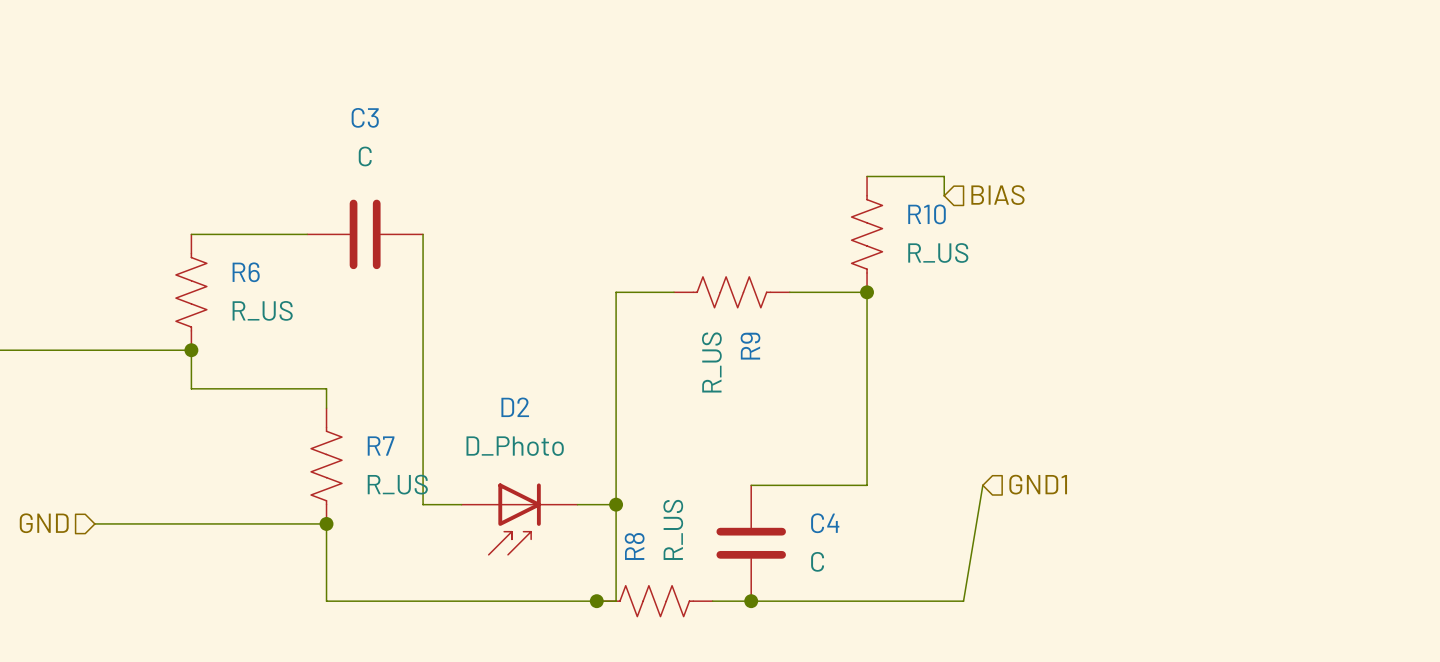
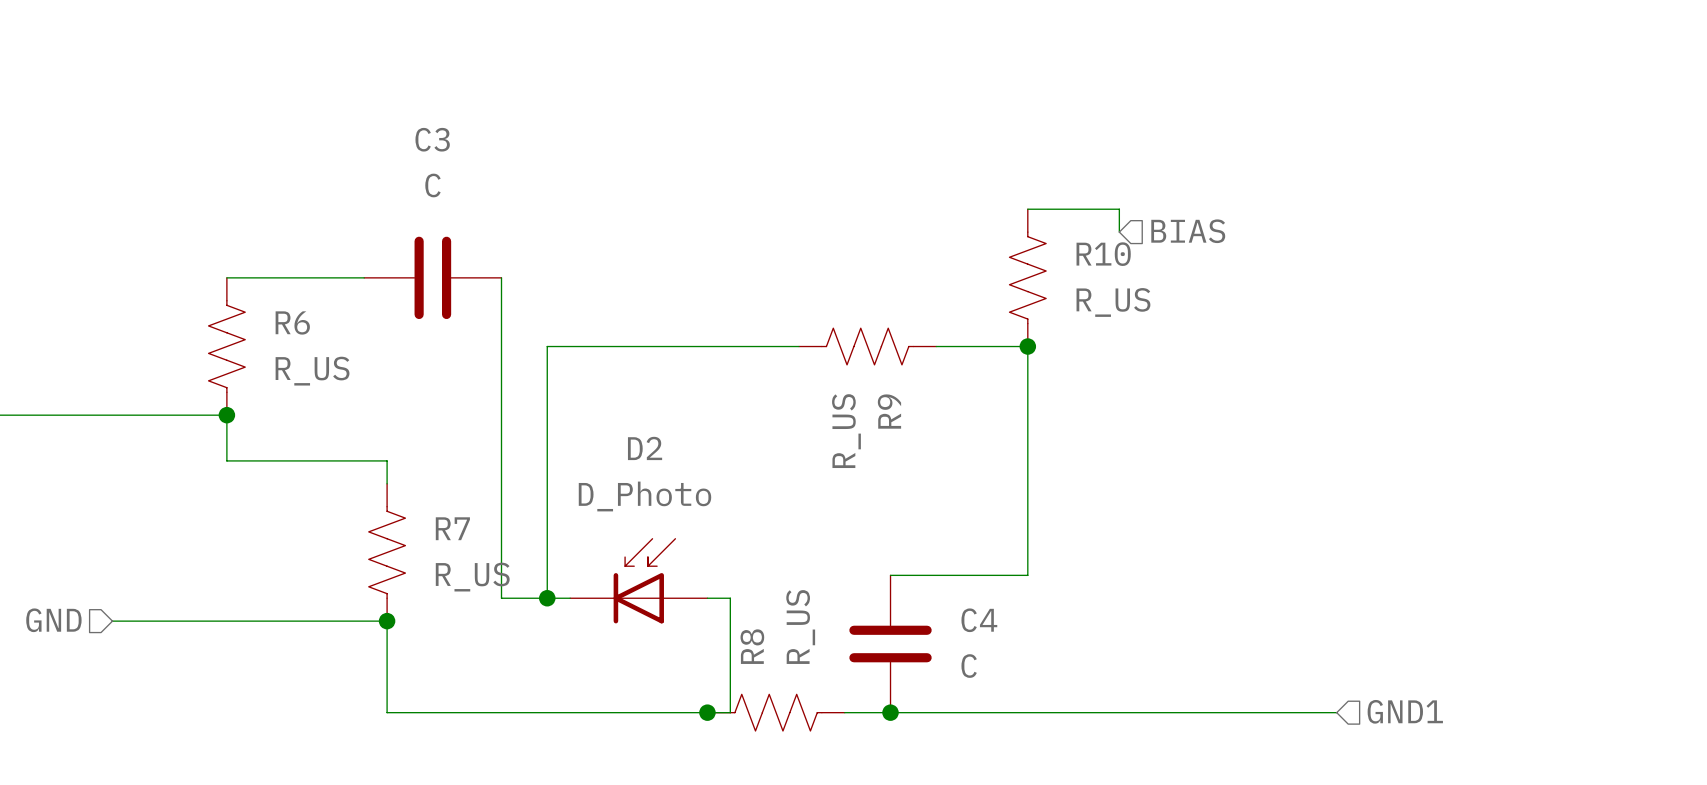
wire: (616, 292) (616, 504) -> (730, 346) (547, 346) (547, 598) (570, 598)
hierarchical label position: GND1 (1038, 484) -> GND1 (1405, 711)
wire: (982, 485) (963, 601) -> (1336, 712) (1142, 712)
junction: none -> (547, 598)
junction: (616, 504) -> none
D2 rotation: 0° (514, 519) -> 180° (644, 581)

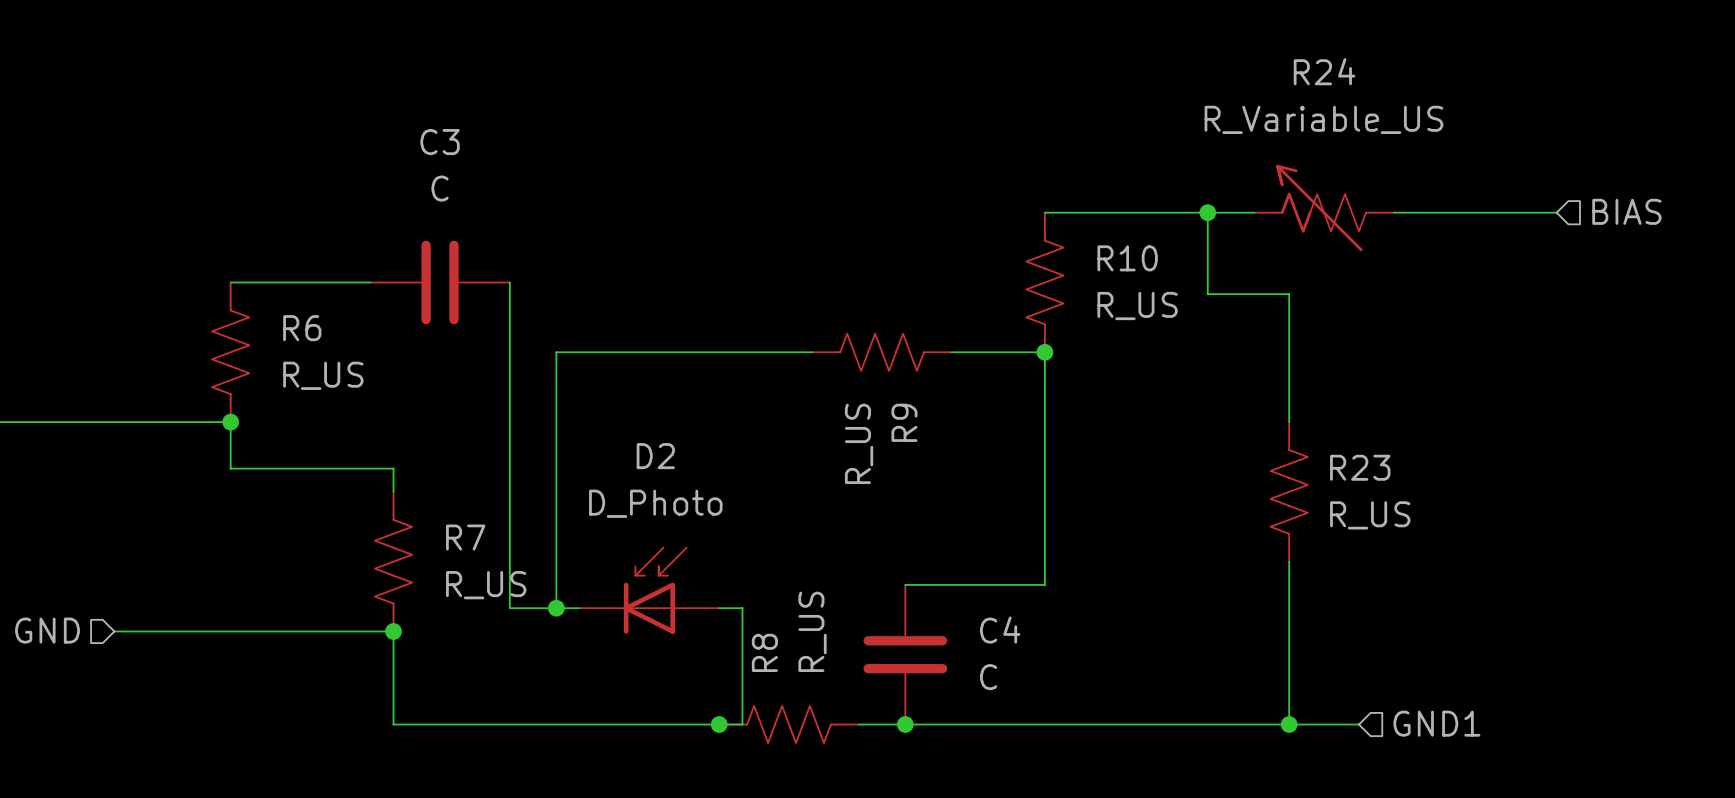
R24: none -> R_Variable_US (1324, 208)
wire: (1119, 209) (1119, 232) -> (1137, 212) (1254, 212)
wire: none -> (1207, 212) (1207, 294) (1289, 294) (1289, 422)
junction: none -> (1207, 212)
wire: none -> (1393, 212) (1556, 212)
hierarchical label position: BIAS (1188, 231) -> BIAS (1626, 211)
R23: none -> R_US (1289, 491)
wire: none -> (1289, 561) (1289, 724)
junction: none -> (1289, 724)

